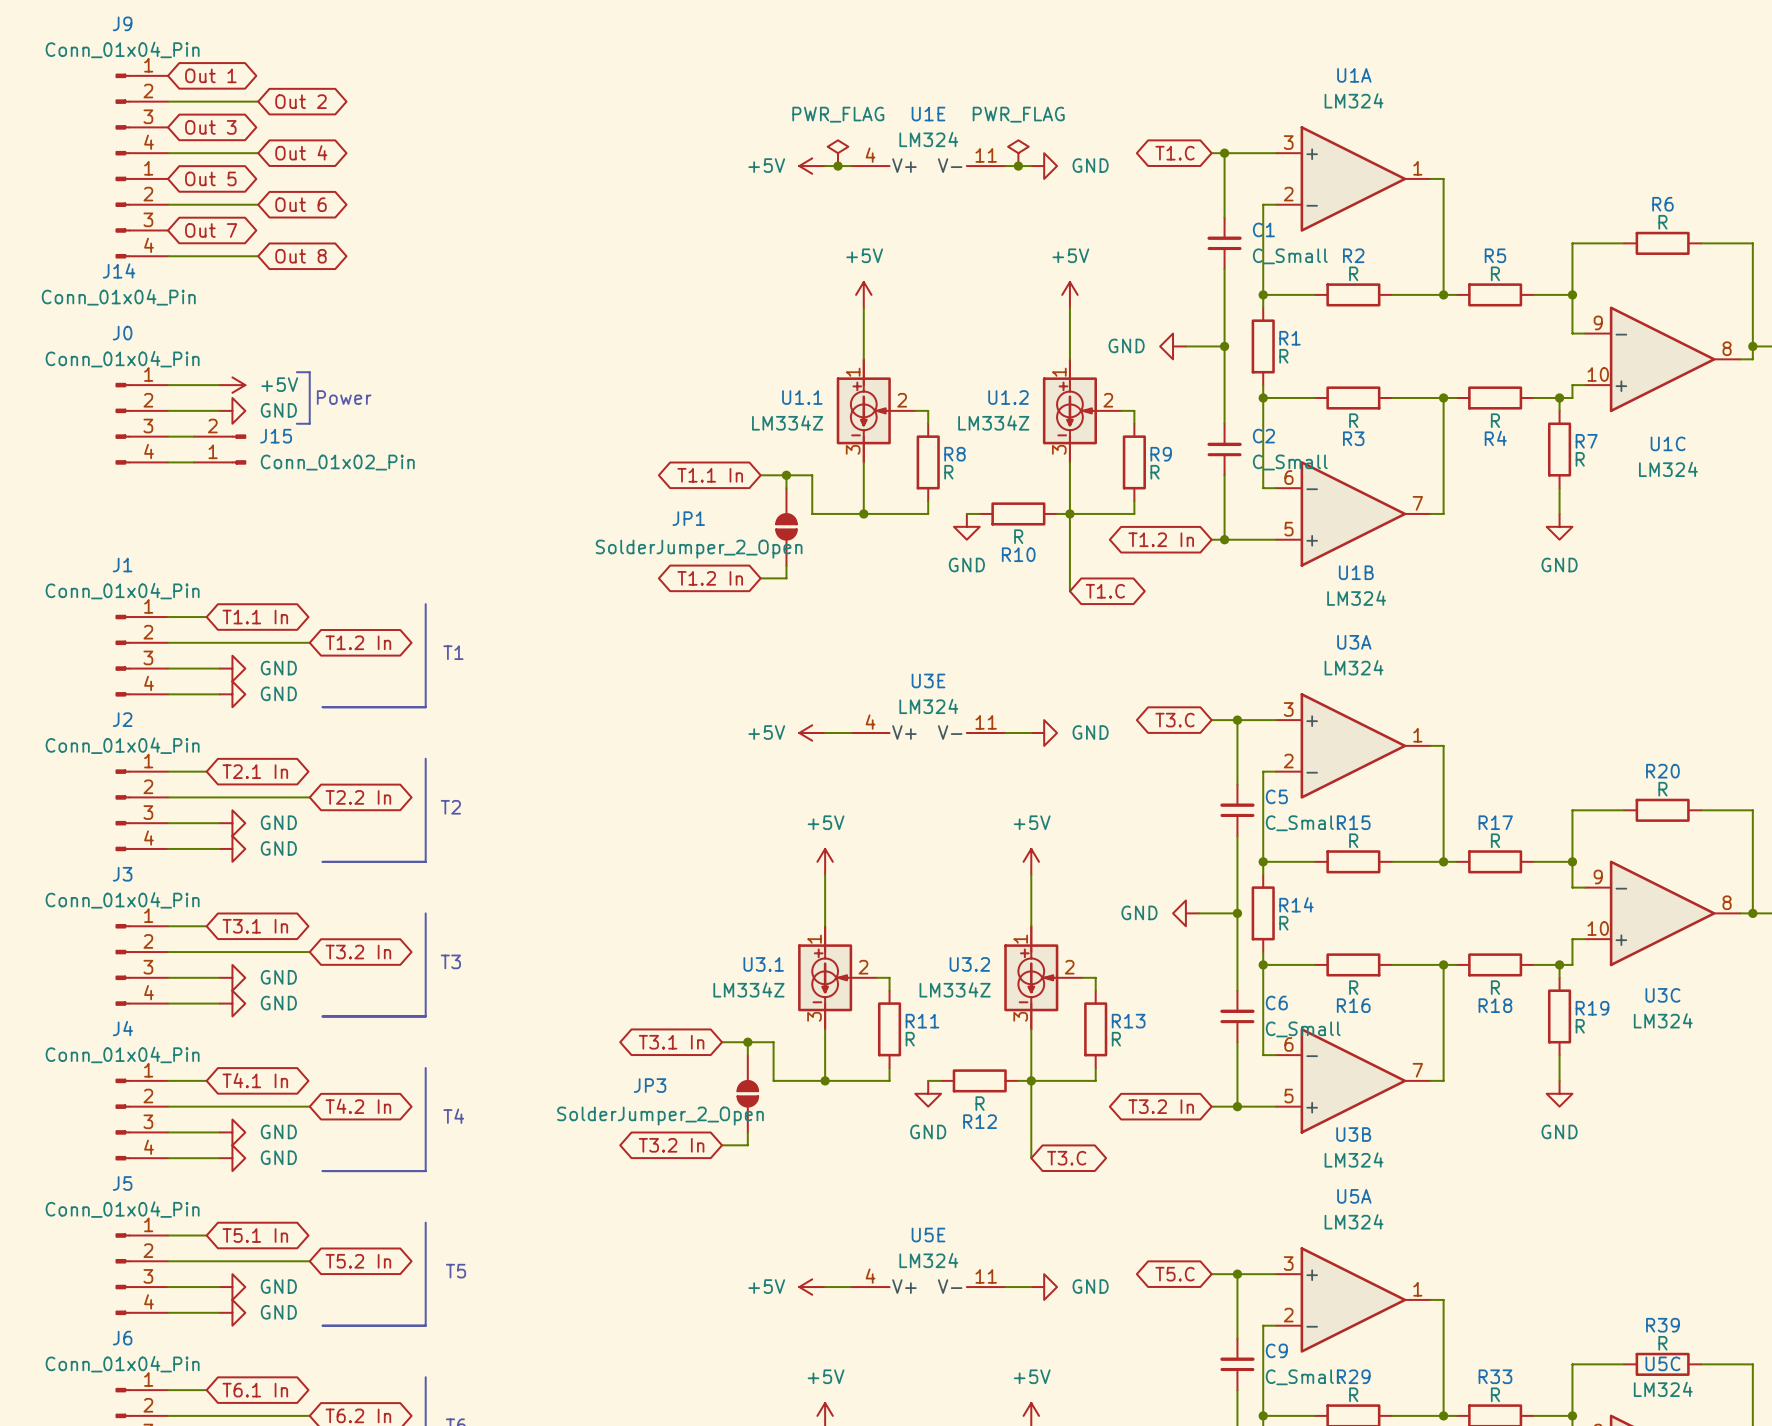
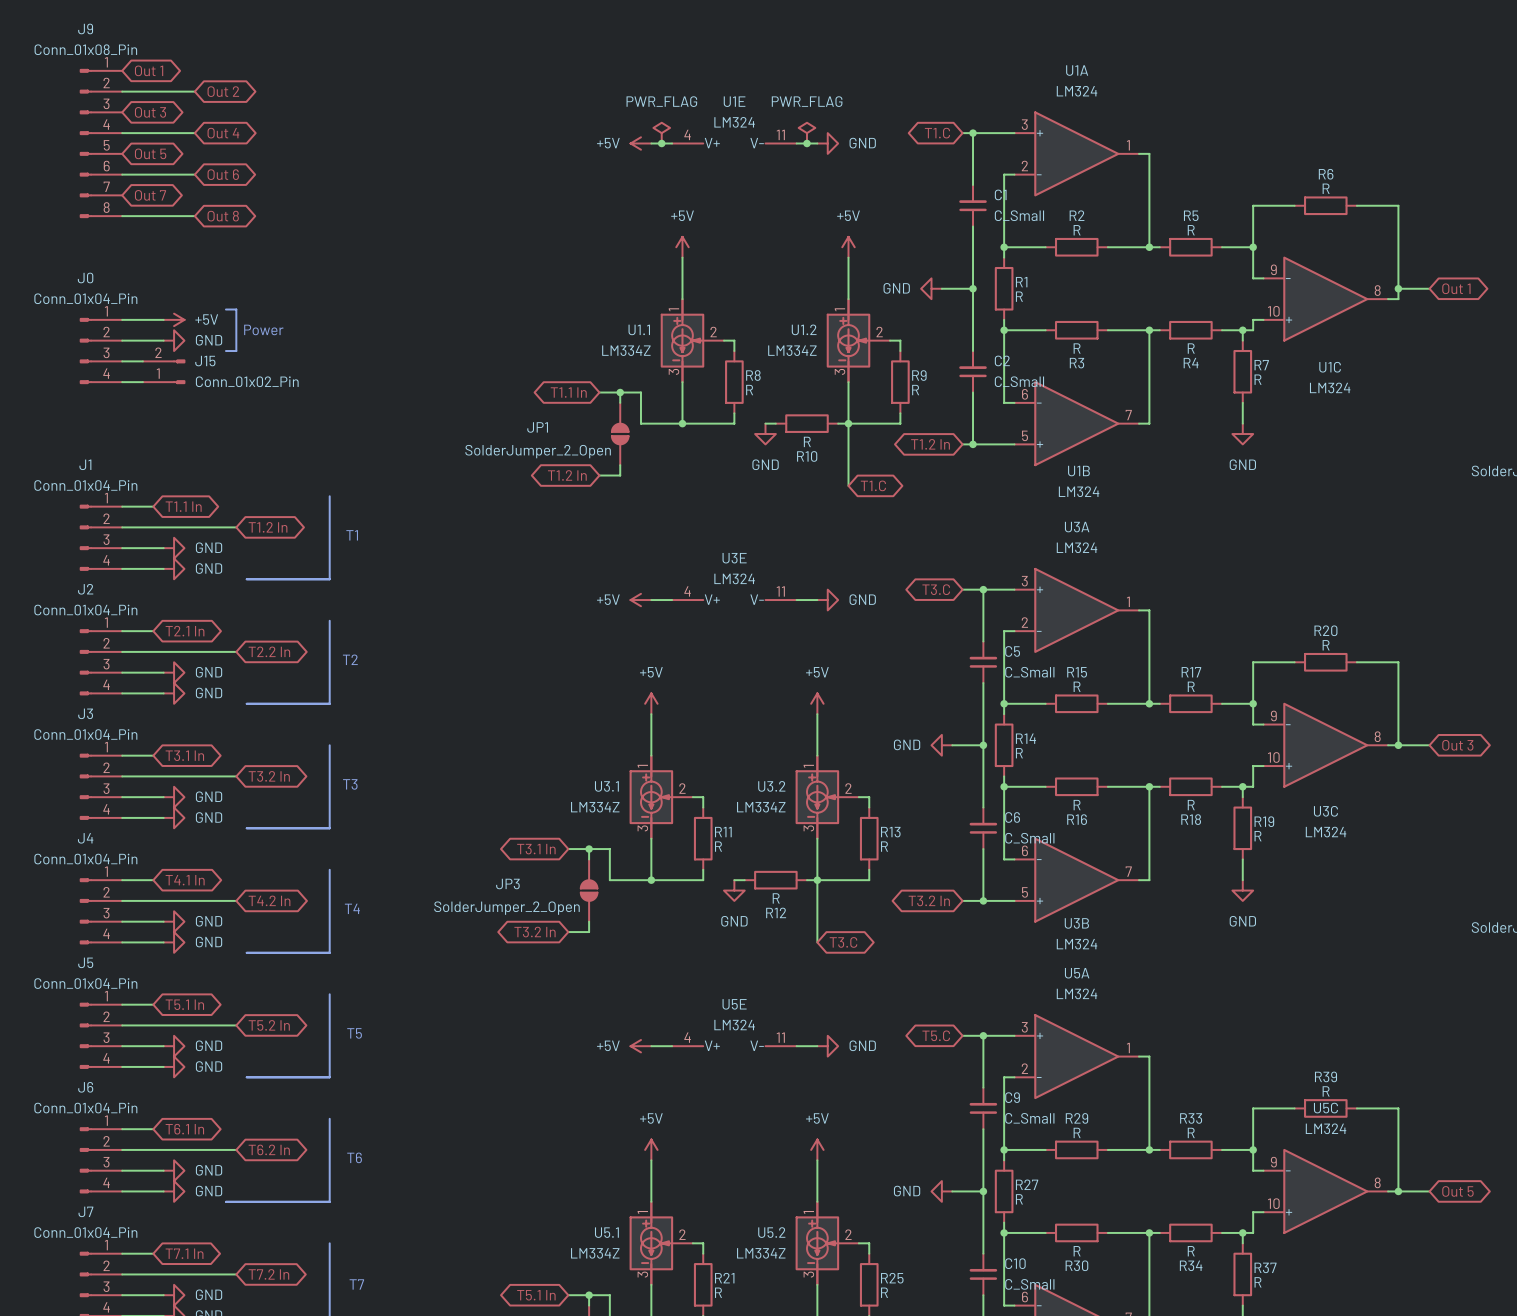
J9 value: Conn_01x04_Pin (122, 49) -> Conn_01x08_Pin (85, 49)
J9 symbol: [115, 73, 169, 156] -> [80, 69, 123, 218]
J14: Conn_01x04_Pin (141, 217) -> none

